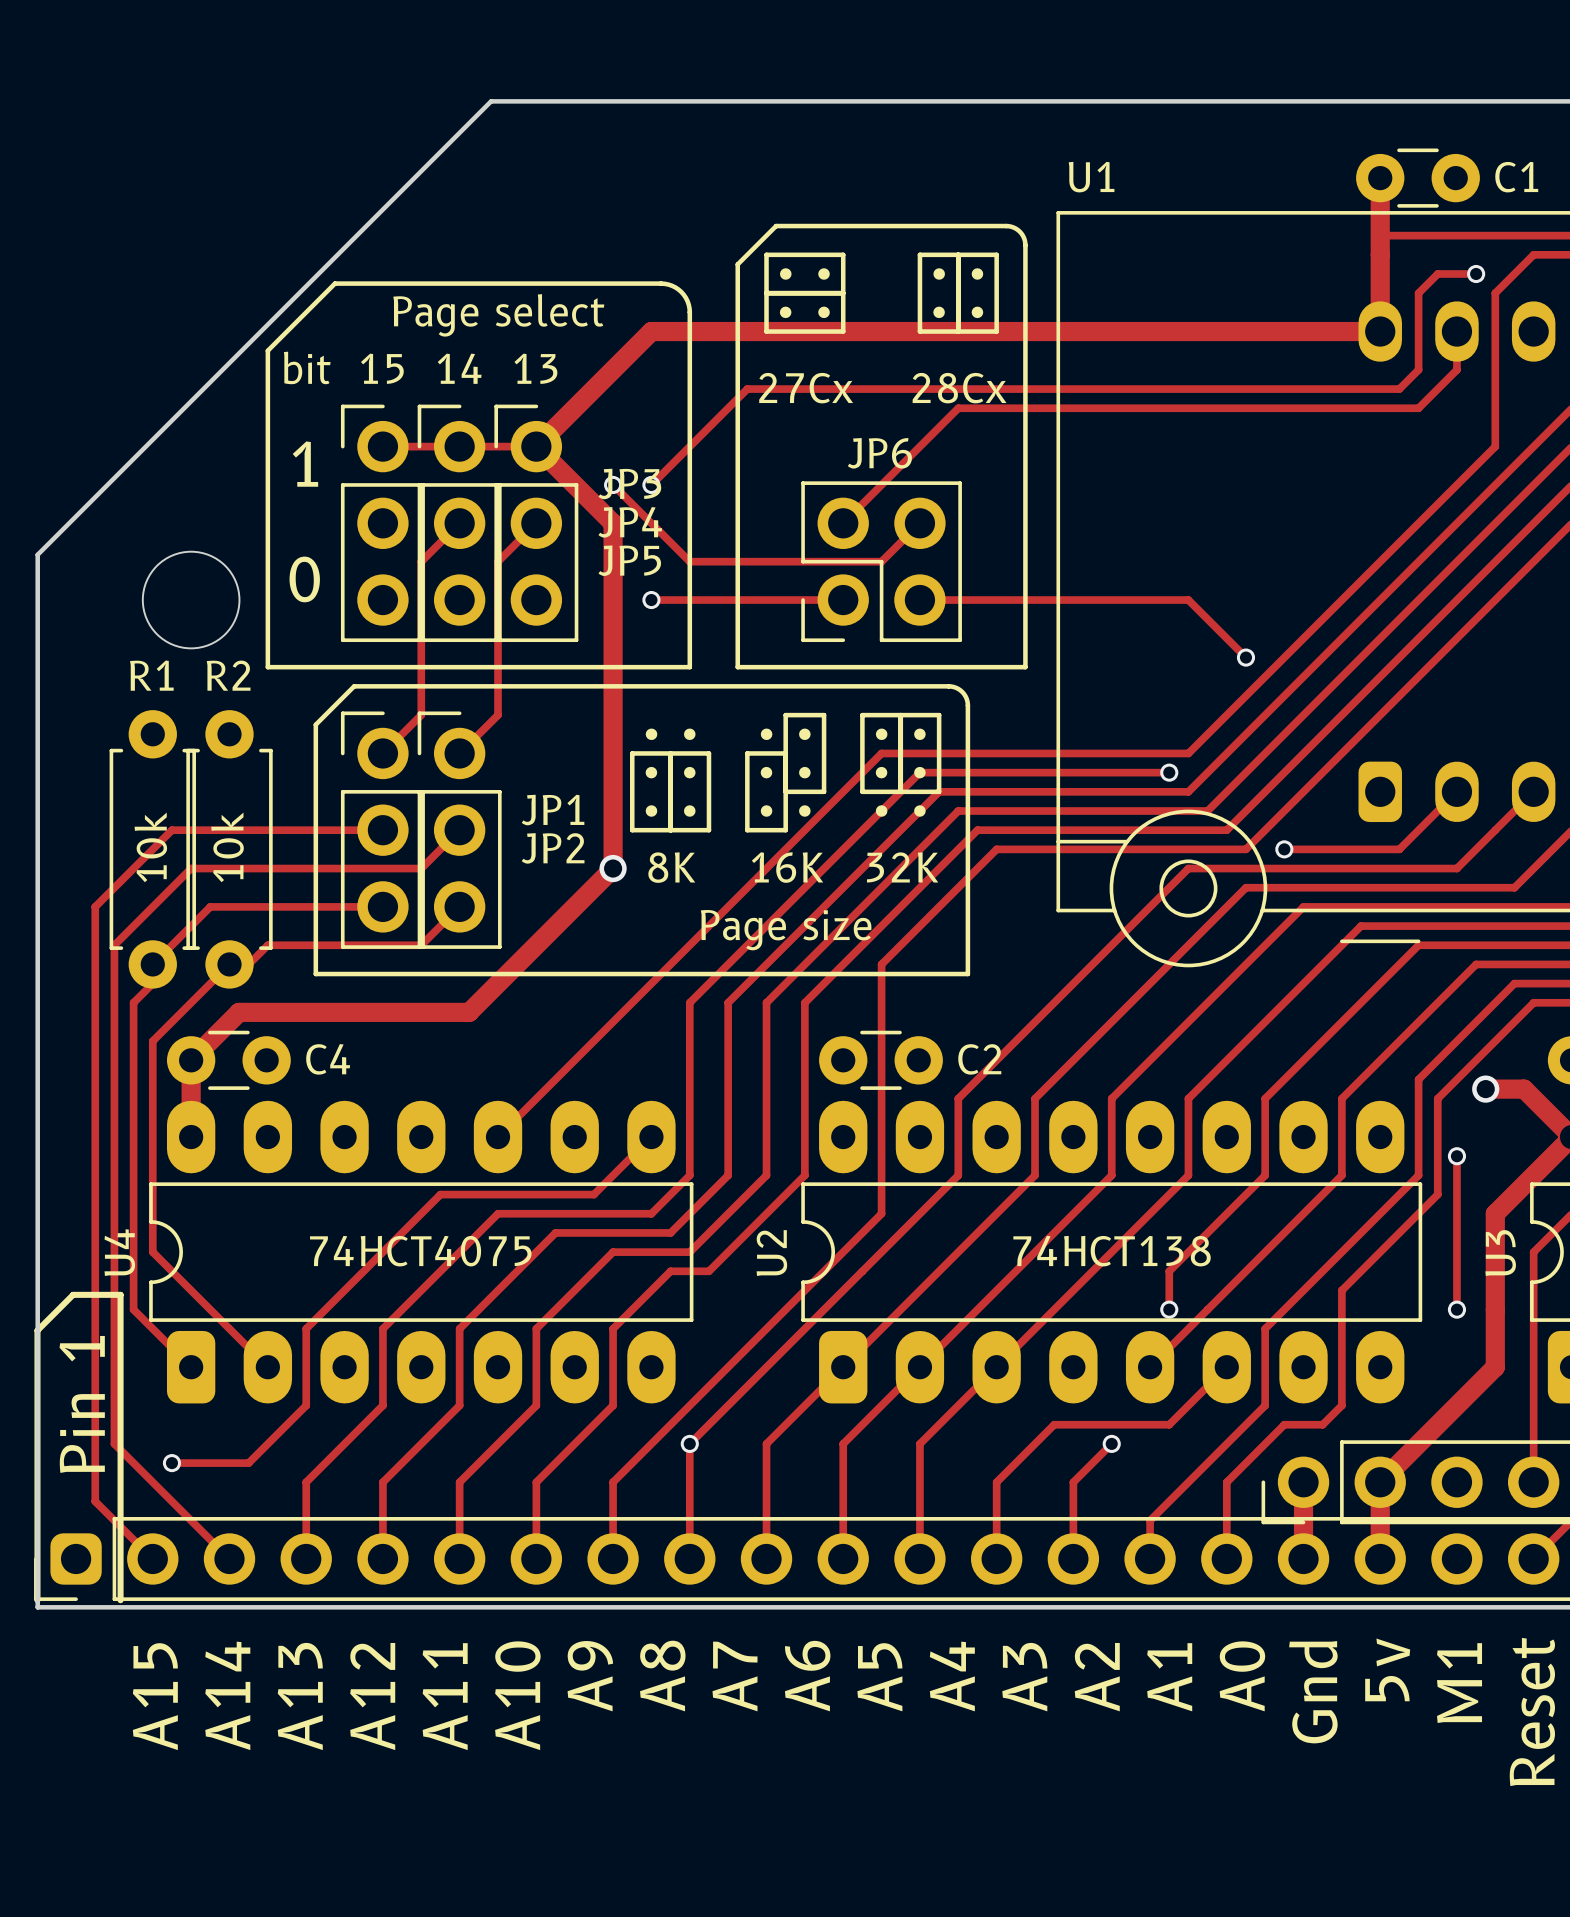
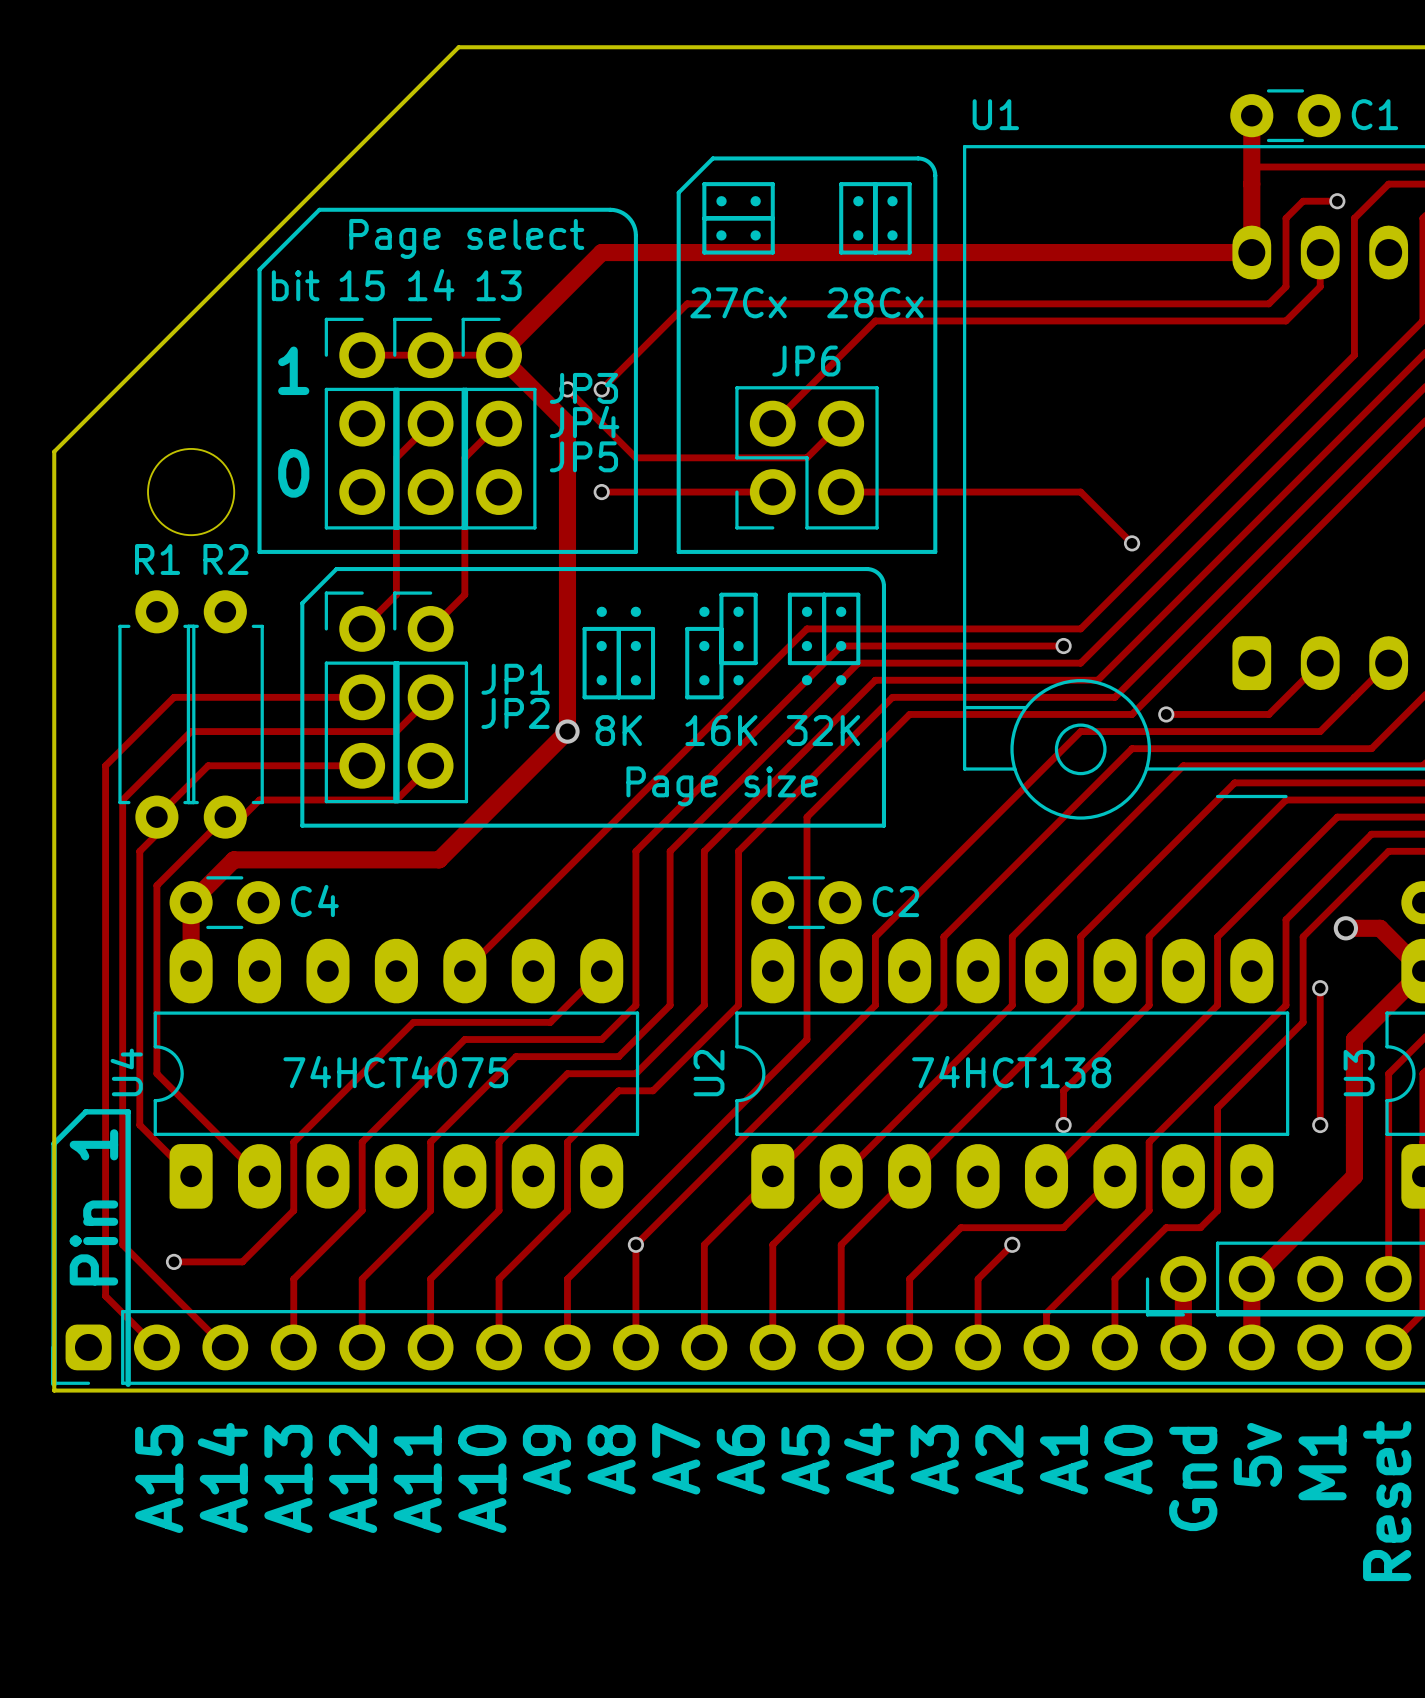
R1 value: 10k (150, 847) -> none
R2 value: 10k (227, 847) -> none

